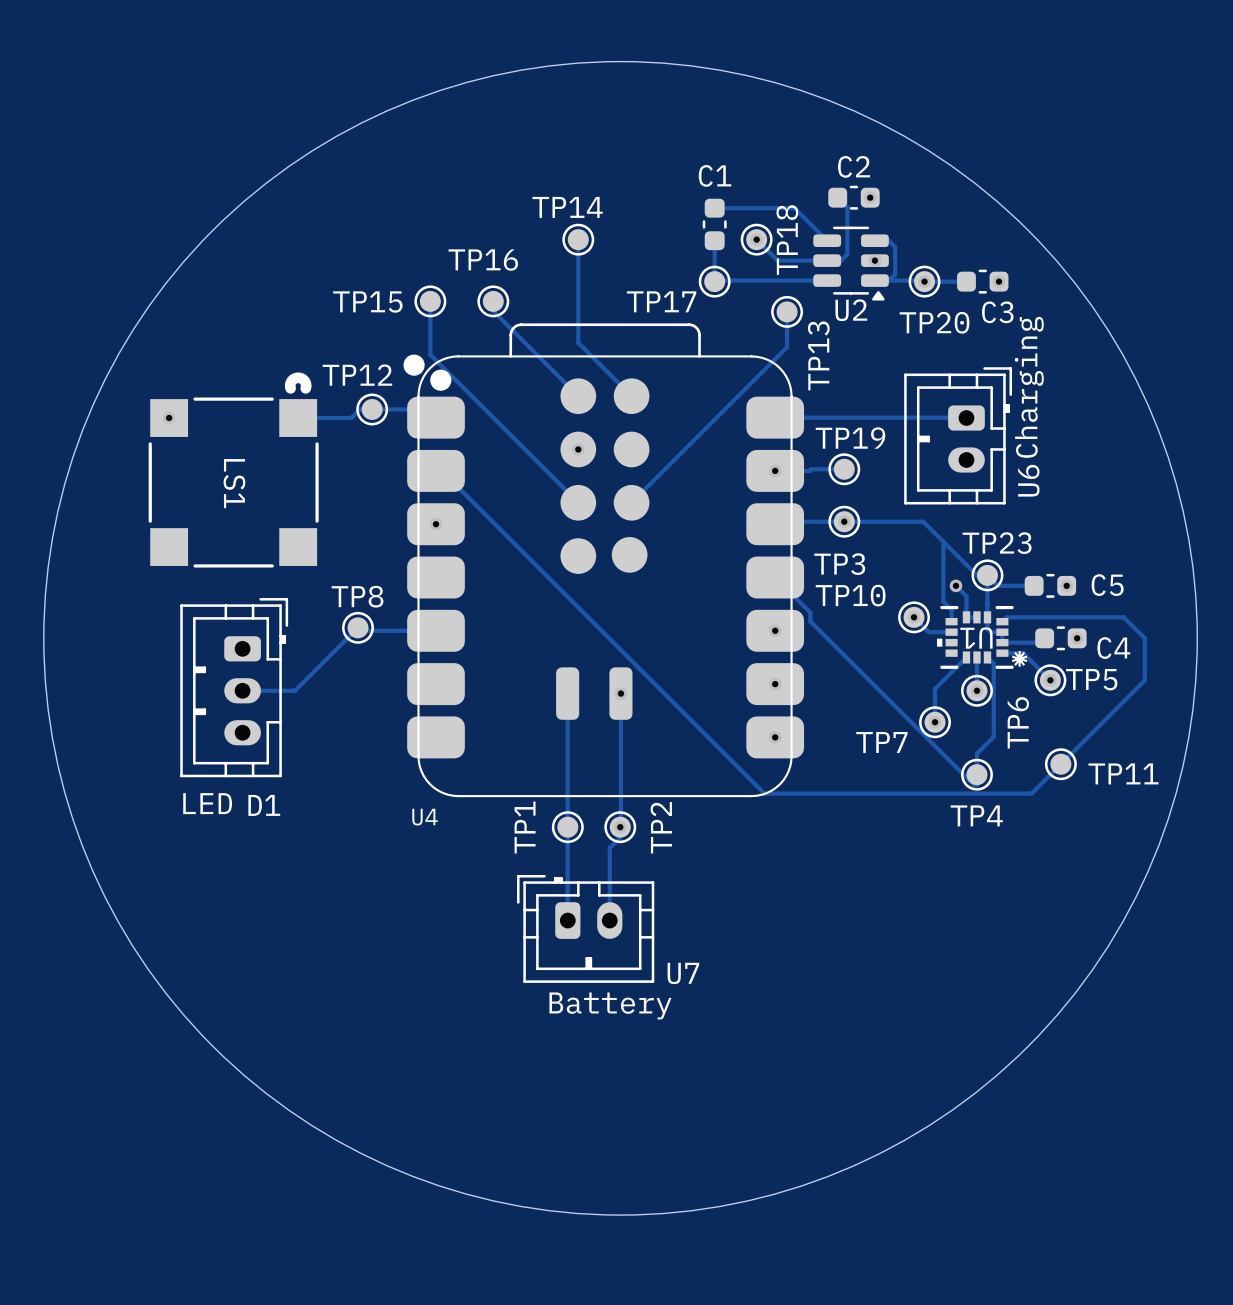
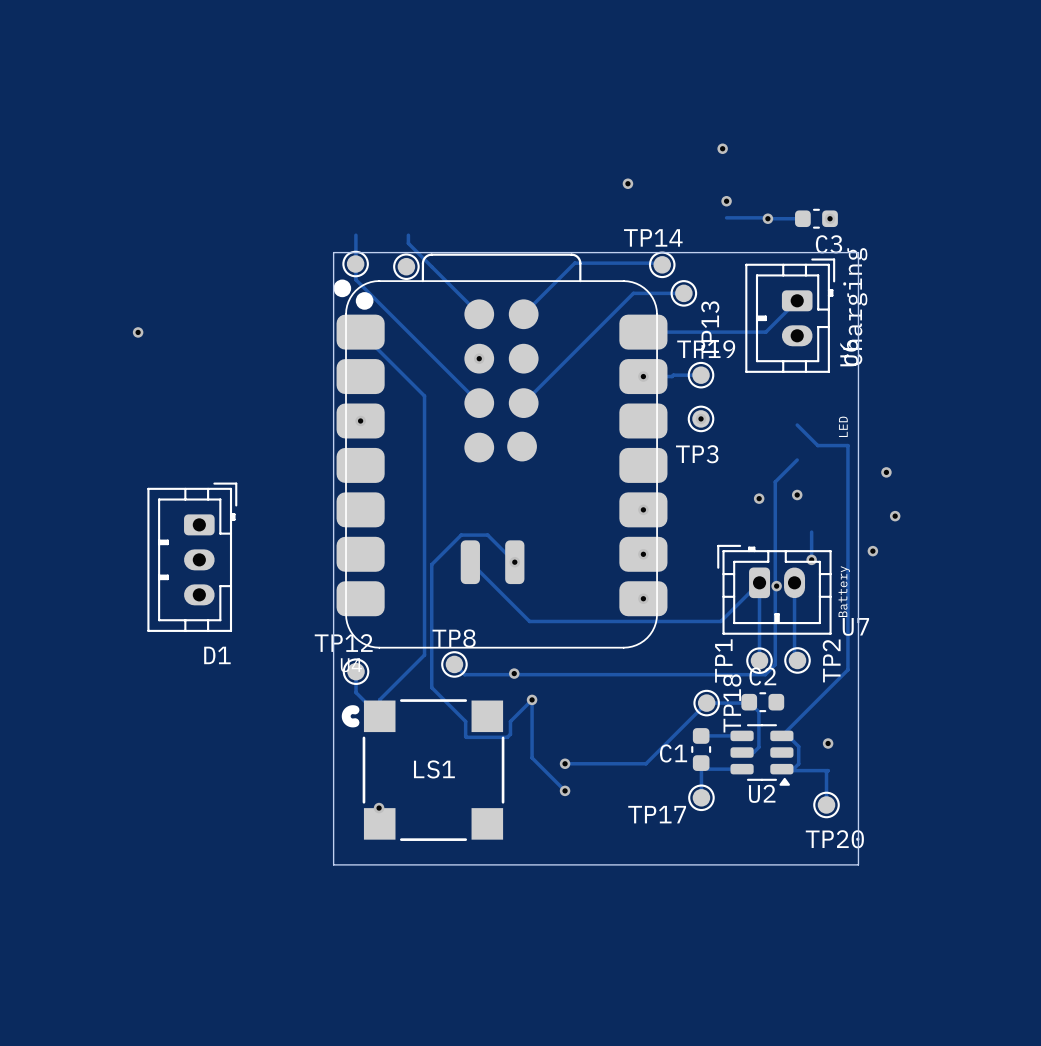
round board edge: [43, 61, 1198, 1216] -> none
C1 name position: C1 (715, 175) -> C1 (673, 753)
track: (837, 197) (847, 207) (847, 254) (841, 260) (777, 260) (756, 239) -> none
C2 position: (853, 197) -> (762, 702)
track: (714, 208) (794, 208) (827, 240) -> none
C1 position: (714, 224) -> (701, 749)
track: (578, 239) (578, 342) (631, 396) -> (662, 264) (660, 263) (574, 263) (523, 314)
TP14 position: (578, 239) -> (662, 264)
TP18 position: (756, 239) -> (706, 703)
track: (714, 240) (714, 280) (827, 280) -> none
track: (874, 240) (888, 240) (895, 247) (895, 274) (888, 280) -> none
U2 position: (851, 263) -> (761, 754)
TP17 position: (714, 281) -> (701, 797)
TP20 position: (924, 281) -> (826, 804)
TP15: (430, 301) -> none
TP16: (493, 301) -> none
track: (787, 311) (787, 347) (763, 371) -> (683, 293) (633, 293)
TP13 position: (787, 311) -> (683, 293)
board edge: none -> (333, 252) (858, 252) (858, 864) (333, 864) (333, 252)
part: none -> (355, 264)
part: none -> (406, 266)
TP12 position: (372, 409) -> (356, 671)
track: (436, 417) (427, 409) (359, 409) (351, 418) (298, 418) -> none
track: (922, 417) (966, 418) -> (765, 332) (797, 300)
track: none -> (368, 335) (364, 332) (360, 332) (424, 396) (424, 655) (379, 699) (379, 716) (356, 692) (356, 671)
U6 position: (958, 435) -> (790, 315)
LS1 rotation: 0° (233, 470) -> 90° counterclockwise (423, 770)
LS1 position: (233, 470) -> (423, 770)
track: (436, 470) (441, 470) (764, 793) (1031, 793) (1144, 680) (1144, 638) (1123, 617) (1006, 617) (1002, 621) -> none
track: (776, 524) (778, 521) (923, 521) (976, 575) (987, 575) -> none
track: none -> (797, 425) (817, 445) (847, 445) (847, 669) (781, 735) (788, 735) (798, 746) (798, 763) (793, 769) (781, 769) (783, 770) (828, 770) (826, 772) (826, 804)
text: none -> LED (843, 426)
track: (945, 543) (943, 546) (943, 601) (951, 609) (951, 621) -> none
track: none -> (797, 460) (775, 481) (775, 664) (765, 674) (464, 674) (454, 664)
track: (987, 575) (987, 629) (990, 632) (1002, 632) (1002, 642) (1040, 642) (1044, 638) -> none
track: (987, 575) (997, 585) (1034, 585) -> none
TP23: (987, 575) -> none
track: (775, 577) (810, 612) (810, 621) (974, 785) (976, 785) (976, 753) (993, 736) (993, 663) (987, 657) -> none
track: (955, 585) (966, 596) (966, 617) (976, 617) -> none
via position: (955, 585) -> (797, 495)
C5: (1050, 585) -> none
track: (914, 617) (928, 632) (951, 632) -> none
TP10: (914, 617) -> none
TP8 position: (357, 627) -> (454, 664)
track: (436, 630) (360, 630) (357, 627) (295, 690) (242, 690) -> none
U1: (975, 637) -> none
C4: (1060, 638) -> none
track: (1002, 653) (1023, 653) (1050, 680) -> none
track: (966, 659) (966, 657) (935, 688) (935, 722) -> none
TP5: (1050, 680) -> none
TP6: (976, 690) -> none
track: (567, 693) (567, 920) -> (470, 562) (529, 621) (720, 621) (759, 582) (759, 660)
track: (620, 693) (620, 826) (620, 837) (609, 848) (609, 920) -> (514, 562) (487, 535) (461, 535) (431, 564) (431, 687) (465, 721) (466, 737) (507, 737) (510, 734) (510, 721) (532, 699) (532, 757) (565, 790)
track: none -> (794, 582) (794, 654) (799, 658) (797, 660)
TP7: (935, 722) -> none
text: none -> Battery (844, 591)
TP11: (1060, 764) -> none
TP4: (976, 774) -> none
text: LED (207, 803) -> none
TP1 position: (567, 827) -> (759, 660)
TP2 position: (620, 827) -> (797, 660)
via: none -> (532, 699)
track: none -> (701, 735) (742, 735)
via: none -> (828, 743)
track: none -> (742, 752) (753, 752) (758, 747) (758, 711) (749, 702) (706, 703) (646, 763) (565, 763)
U7 position: (585, 928) -> (774, 589)
via: none -> (565, 763)
track: none -> (742, 769) (708, 769) (701, 763) (701, 797)
via: none -> (565, 790)
via: none -> (379, 808)
text: Battery (610, 1005) -> none

